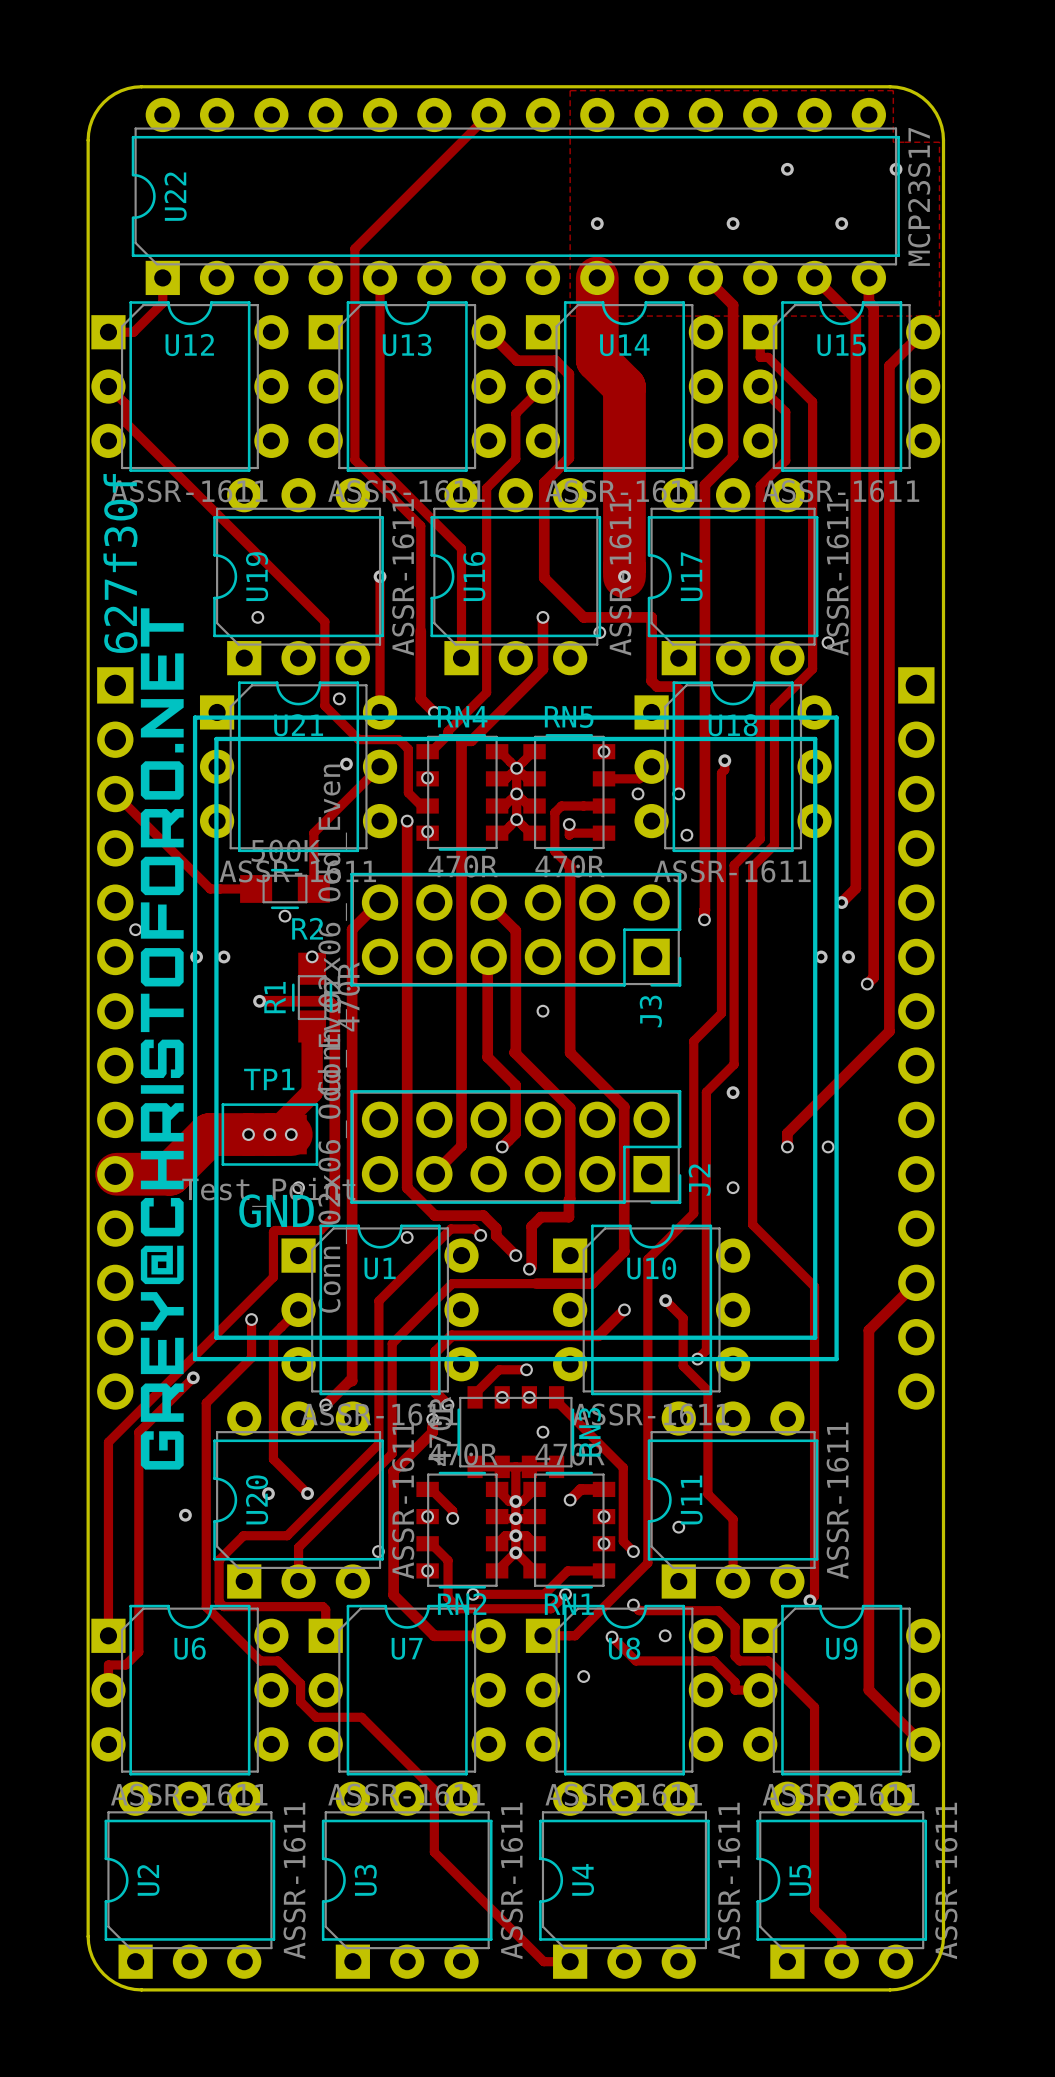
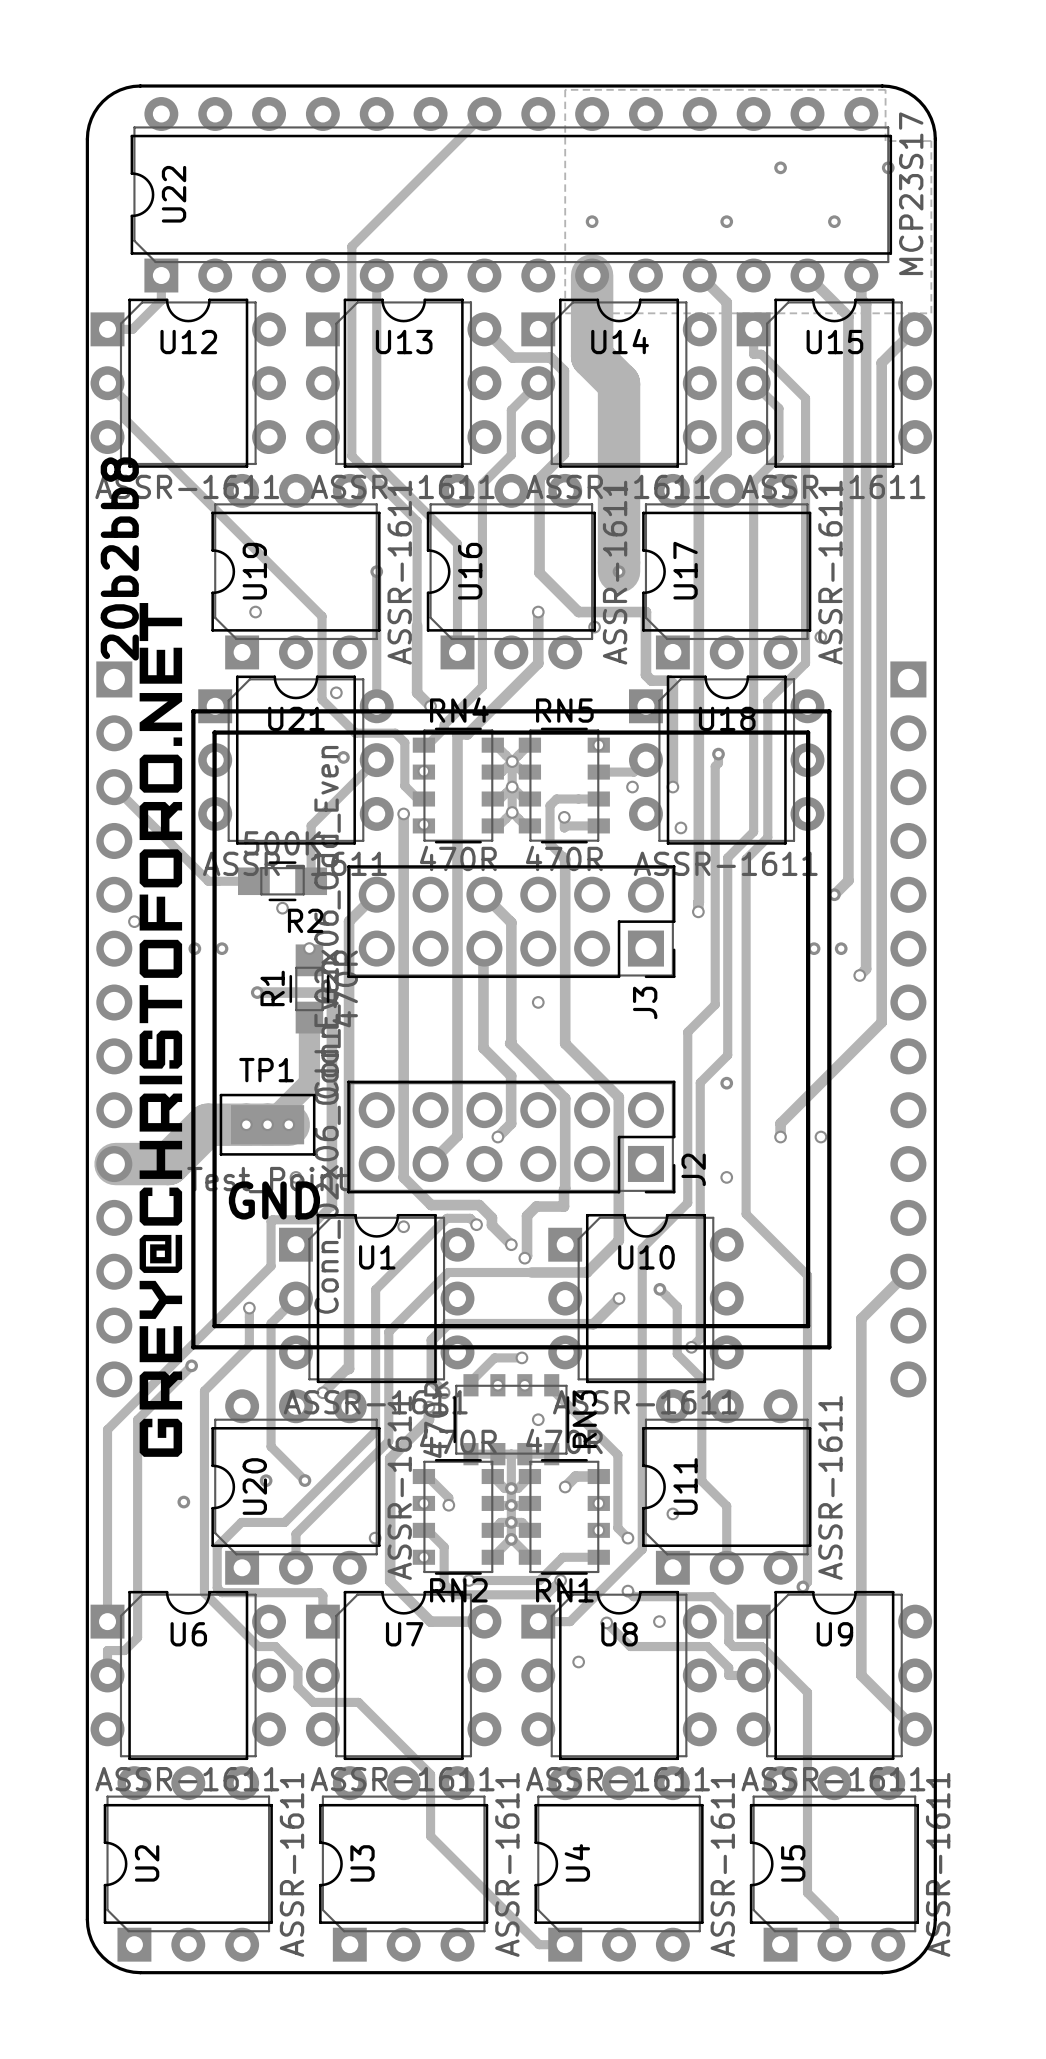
text: 627f30f (120, 563) -> 20b2bb8 (119, 558)

